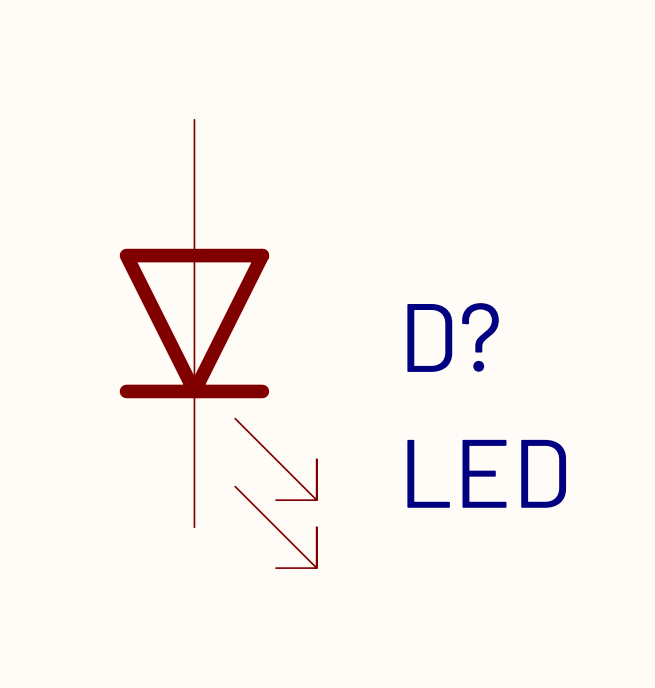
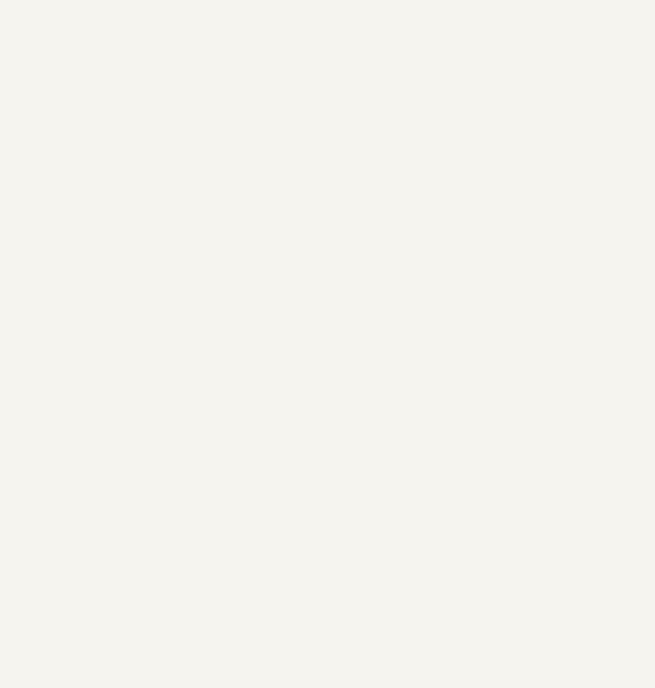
D?: LED (218, 343) -> none

